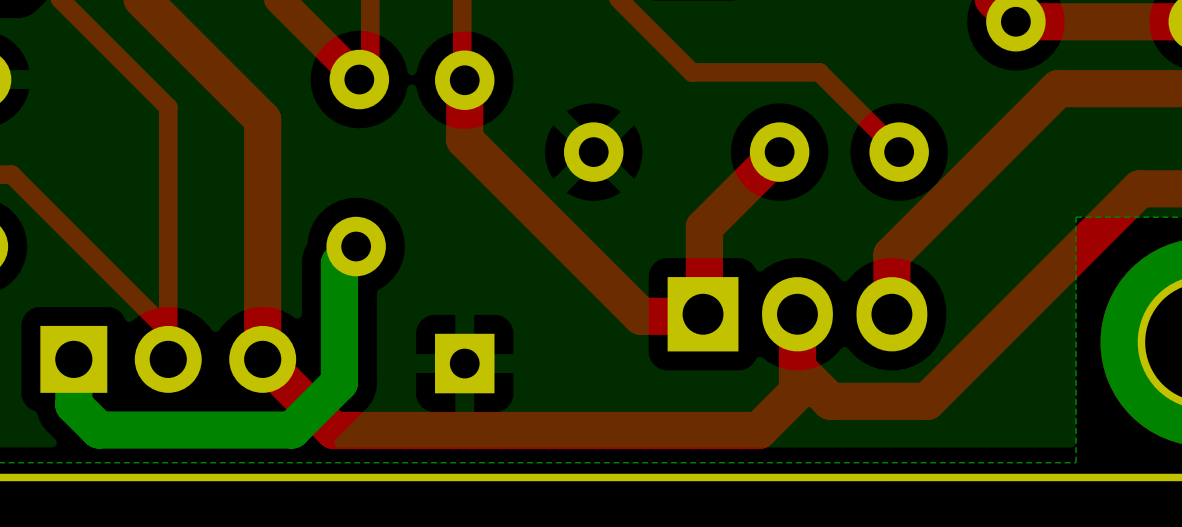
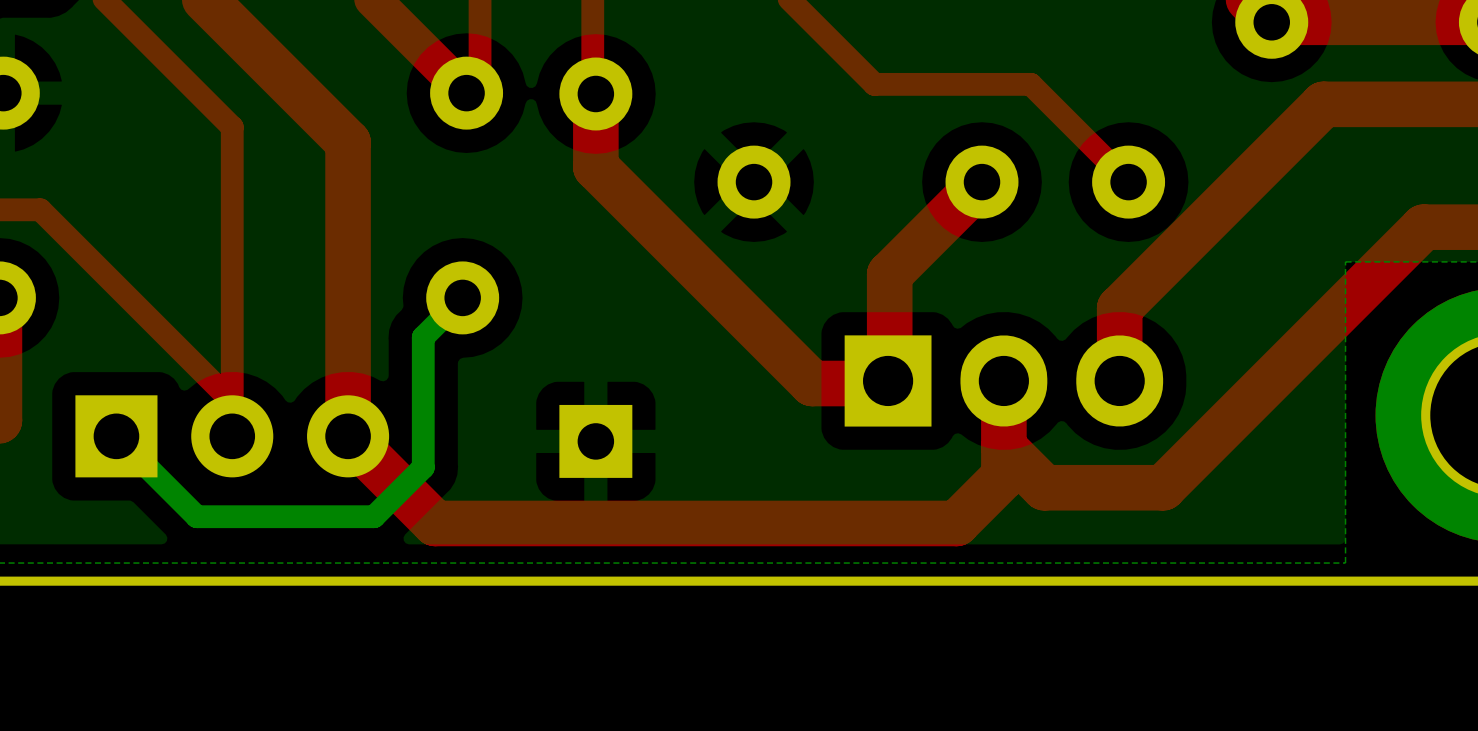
bottom track: (339, 263) (339, 382) (291, 430) (99, 430) (73, 404) (73, 359) -> (442, 318) (423, 337) (423, 467) (374, 516) (196, 516) (116, 436)

